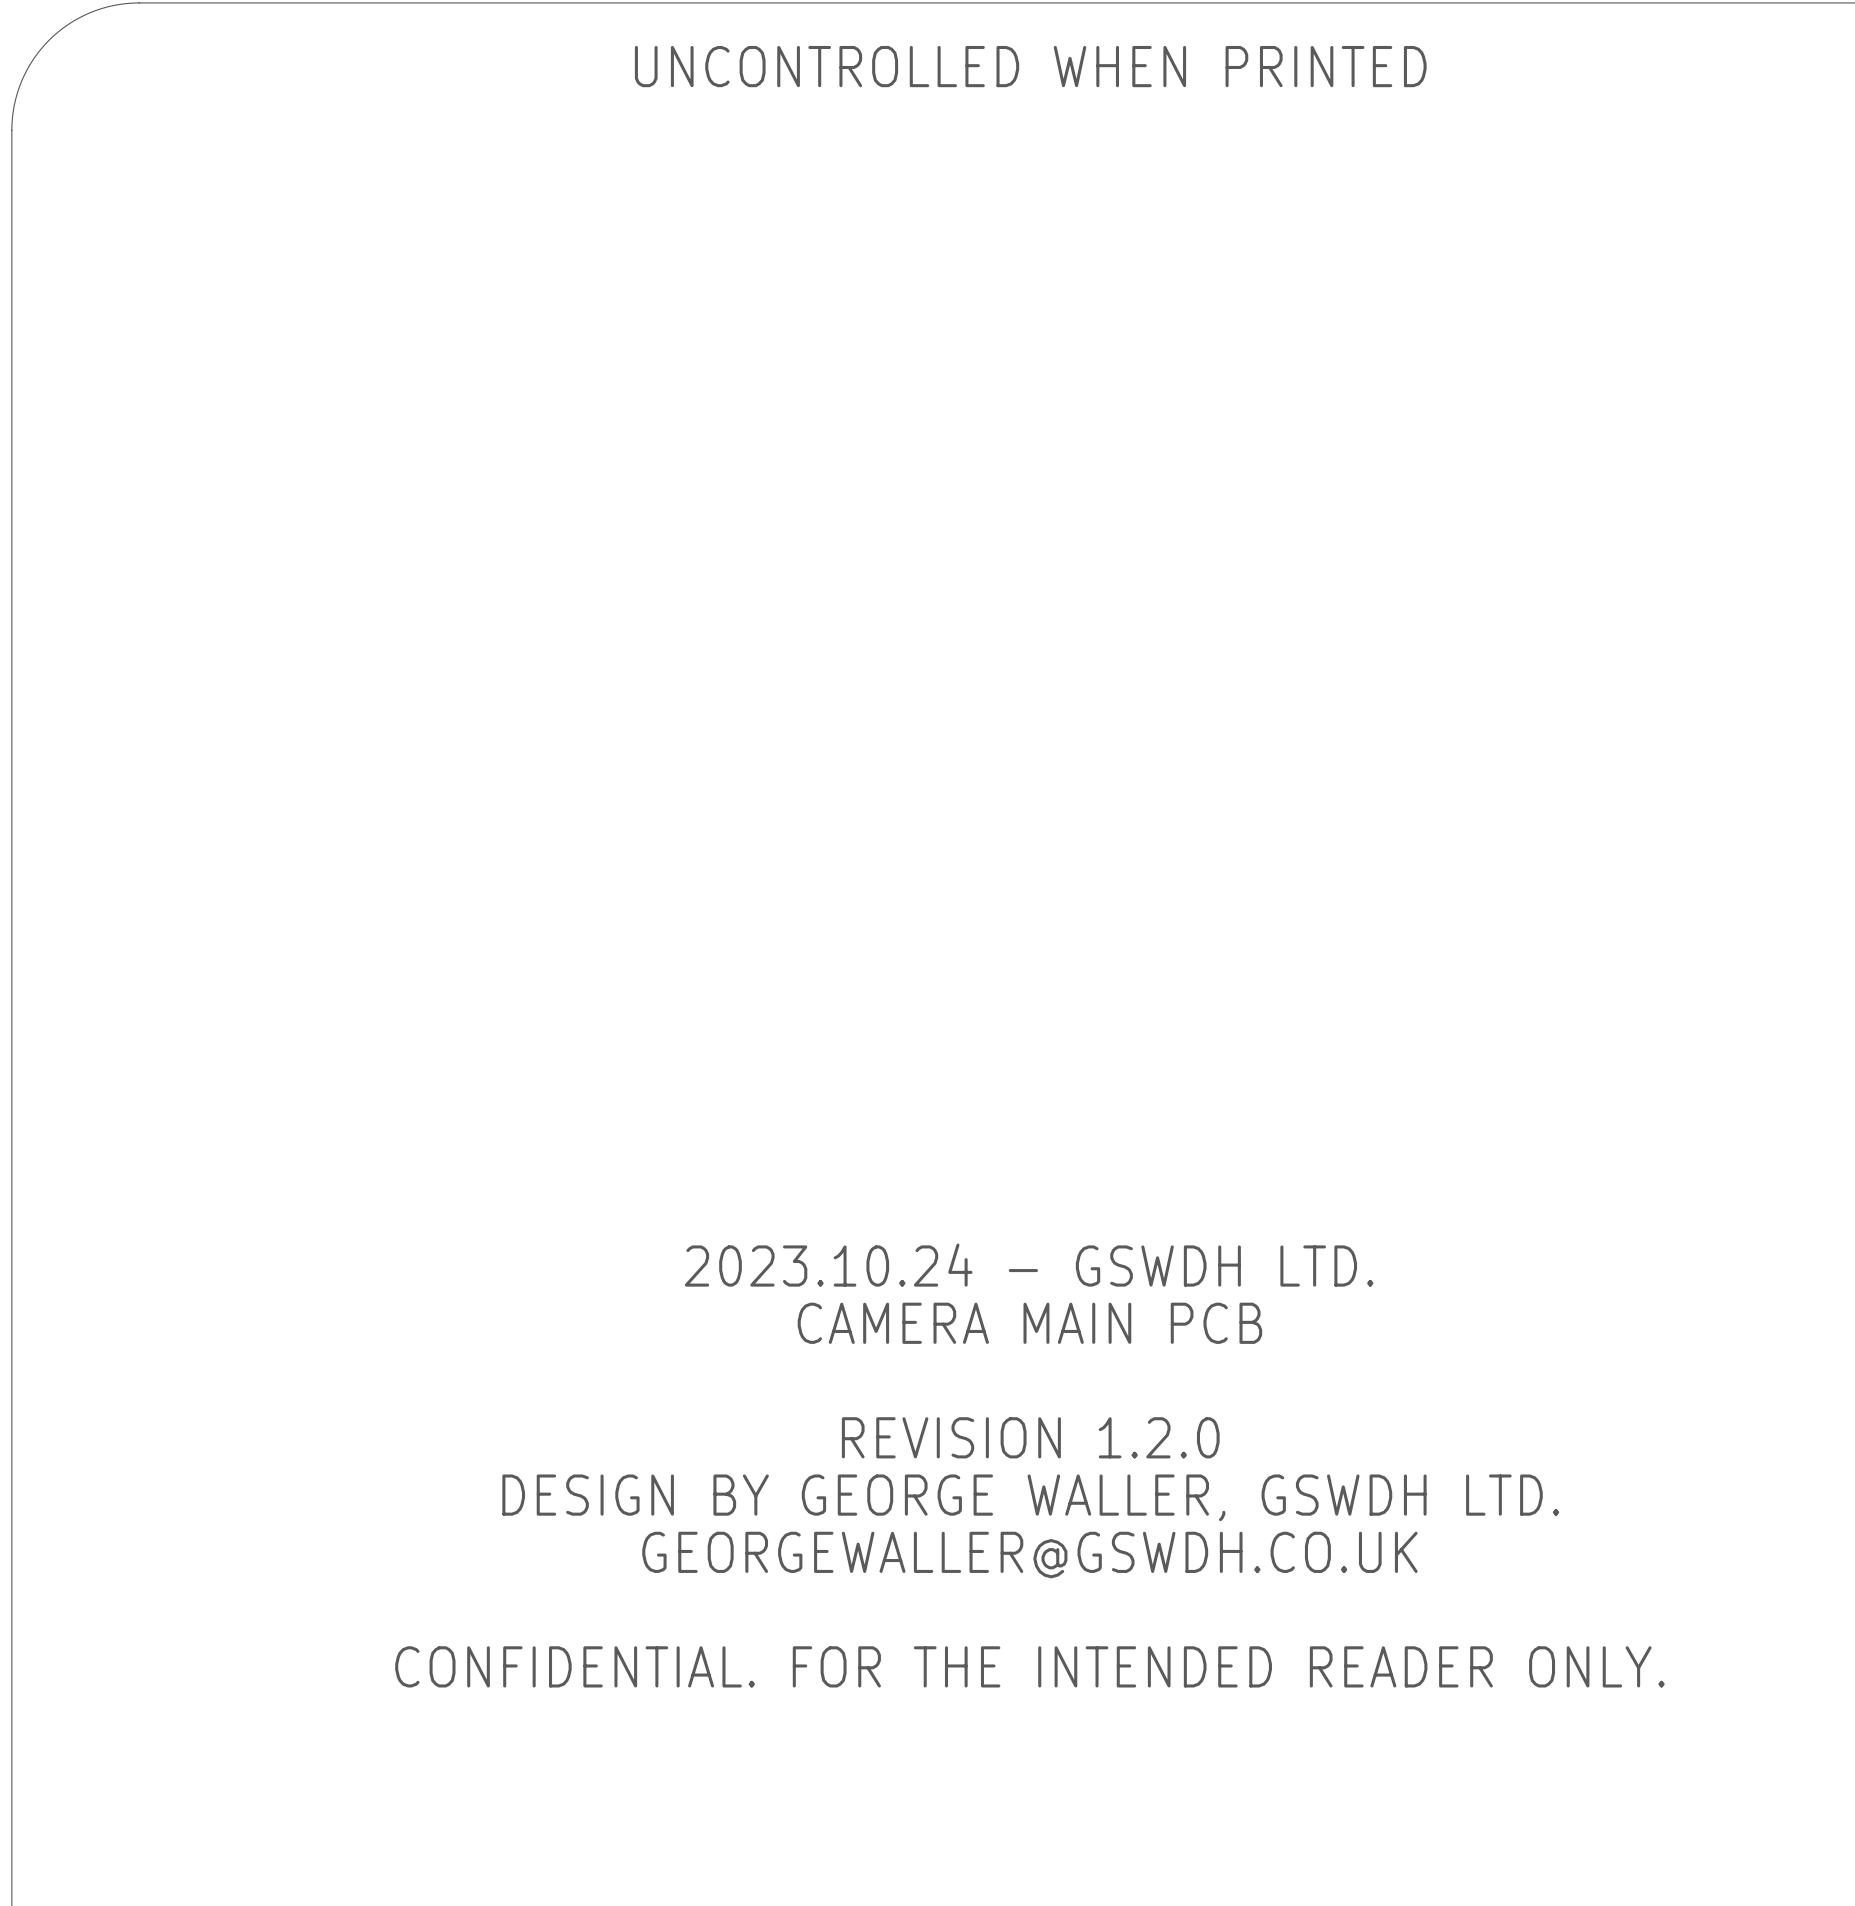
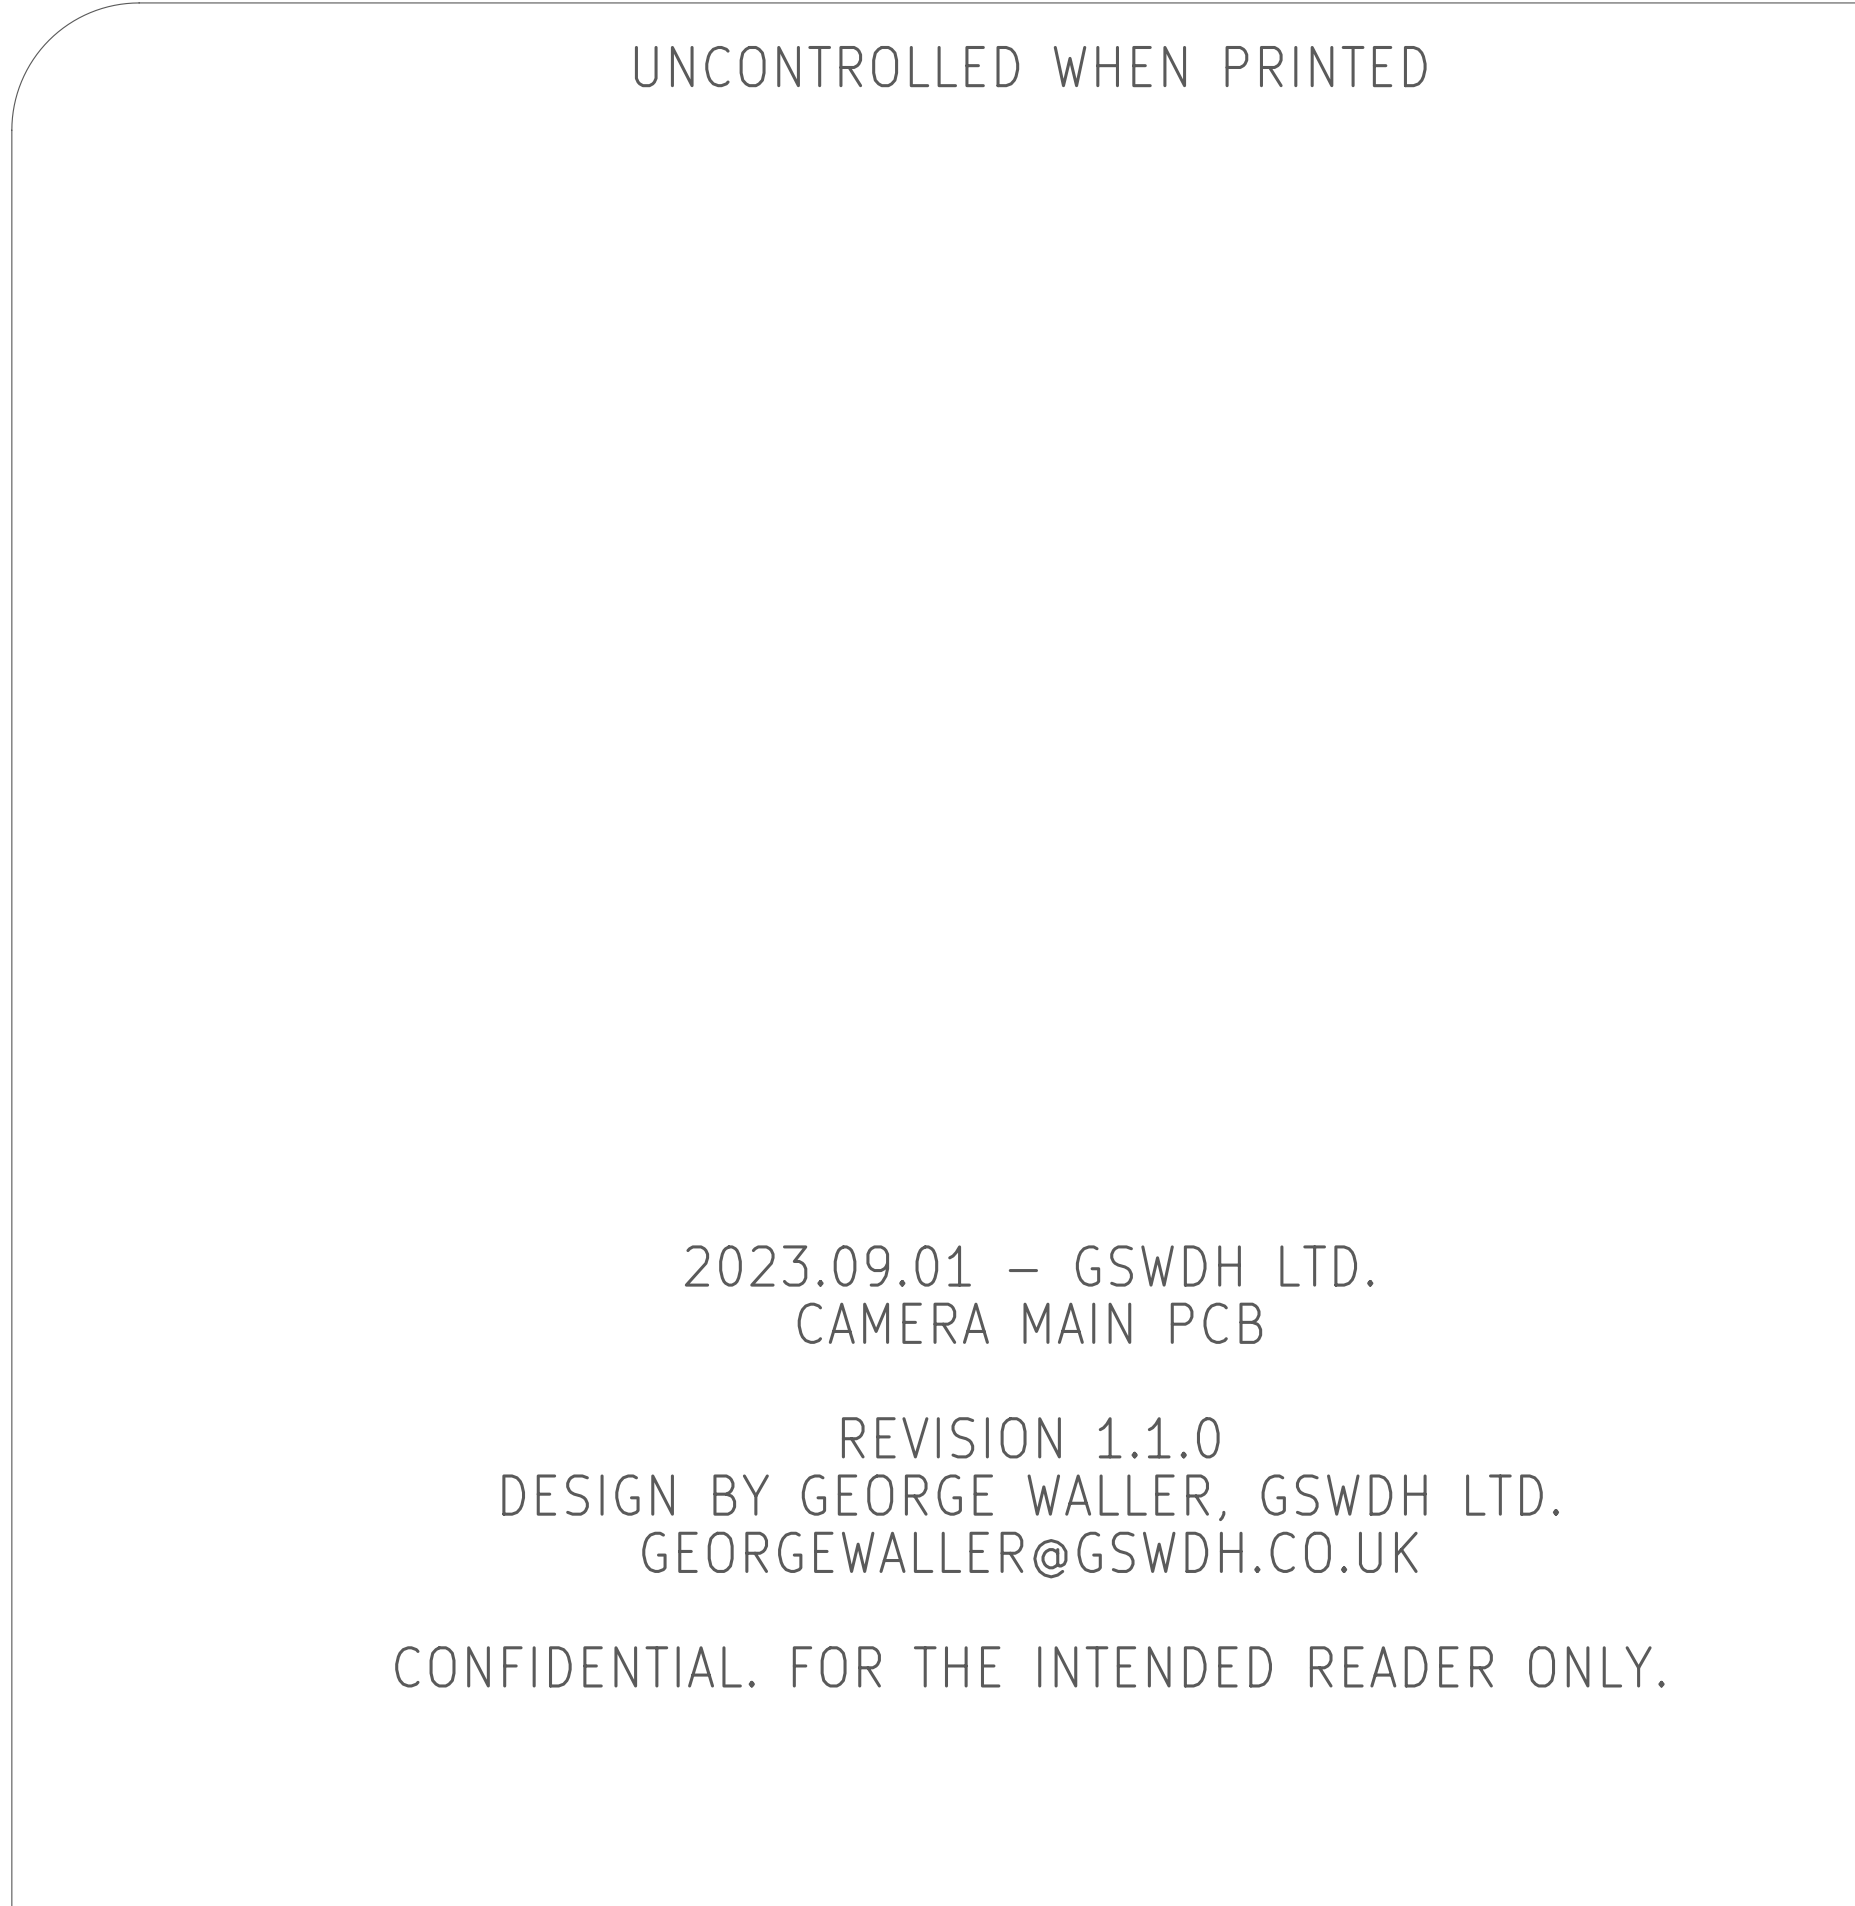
text: 2023.10.24 - GSWDH LTD. (1029, 1265) -> 2023.09.01 - GSWDH LTD. (1029, 1266)
text: REVISION 1.2.0 (1030, 1437) -> REVISION 1.1.0 (1030, 1437)

